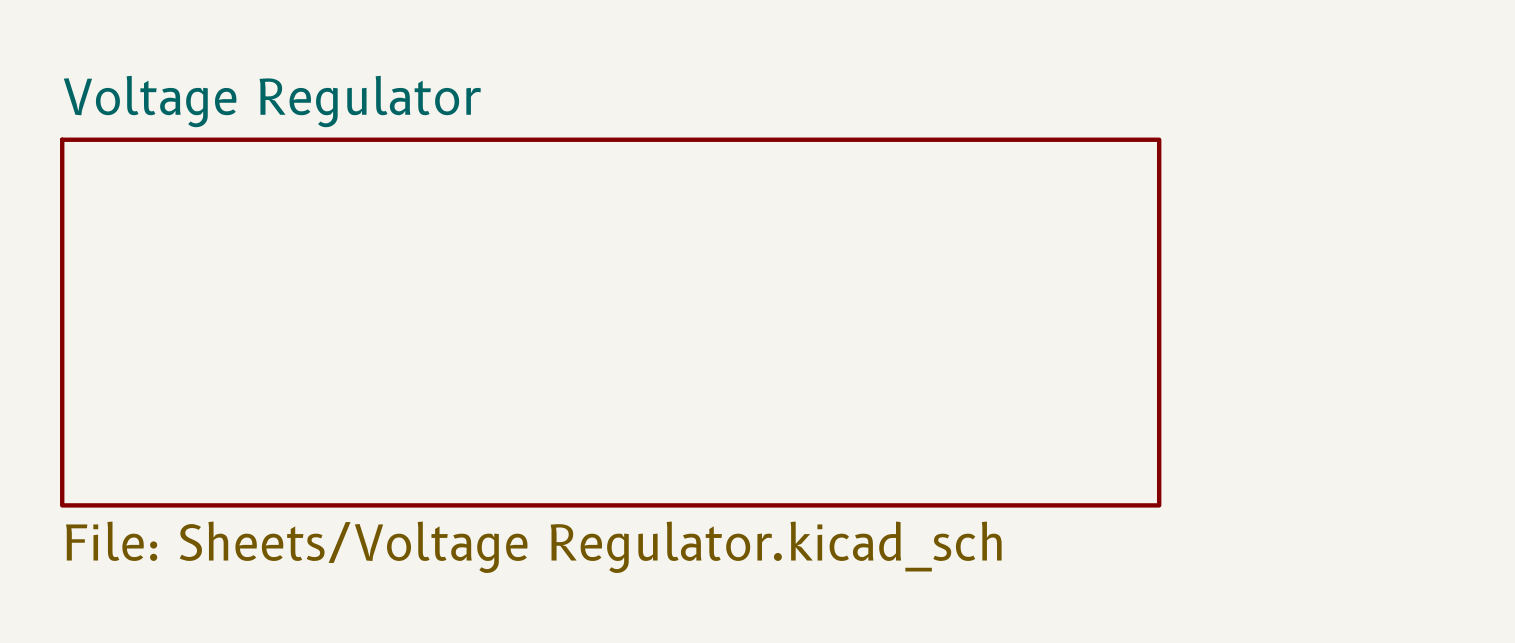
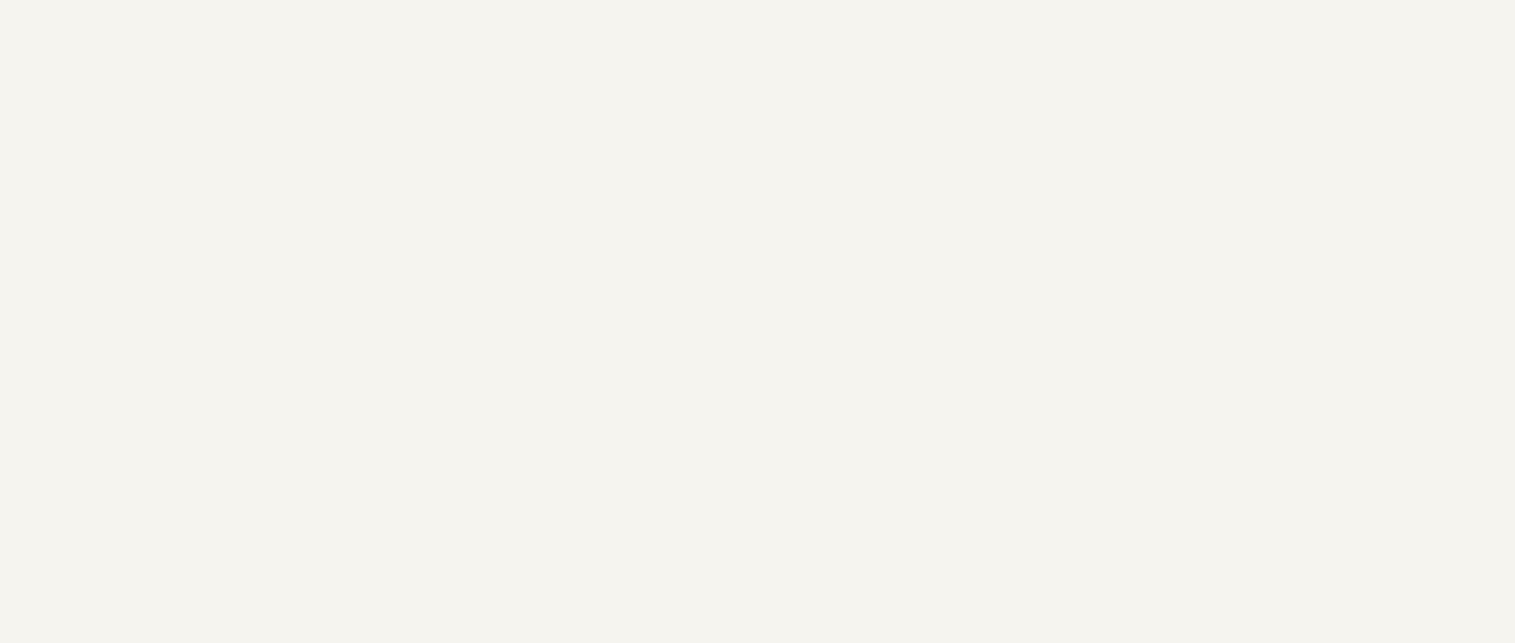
sheet Voltage Regulator: File: Sheets/Voltage Regulator.kicad_sch (610, 322) -> none

